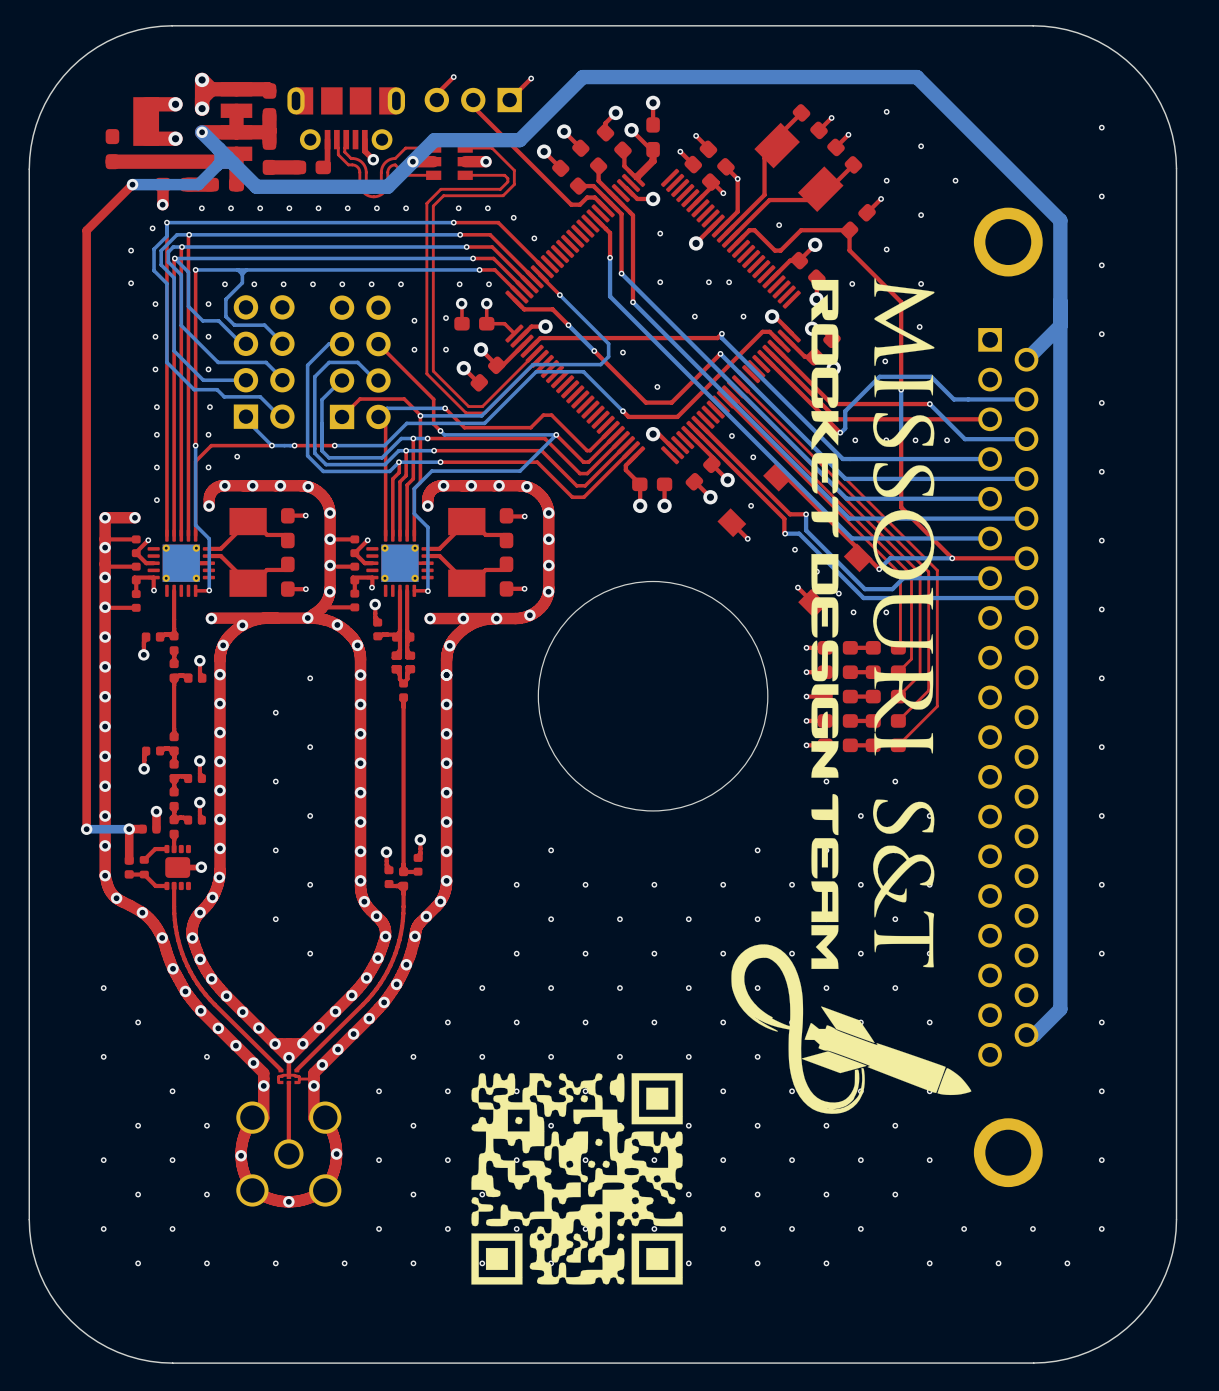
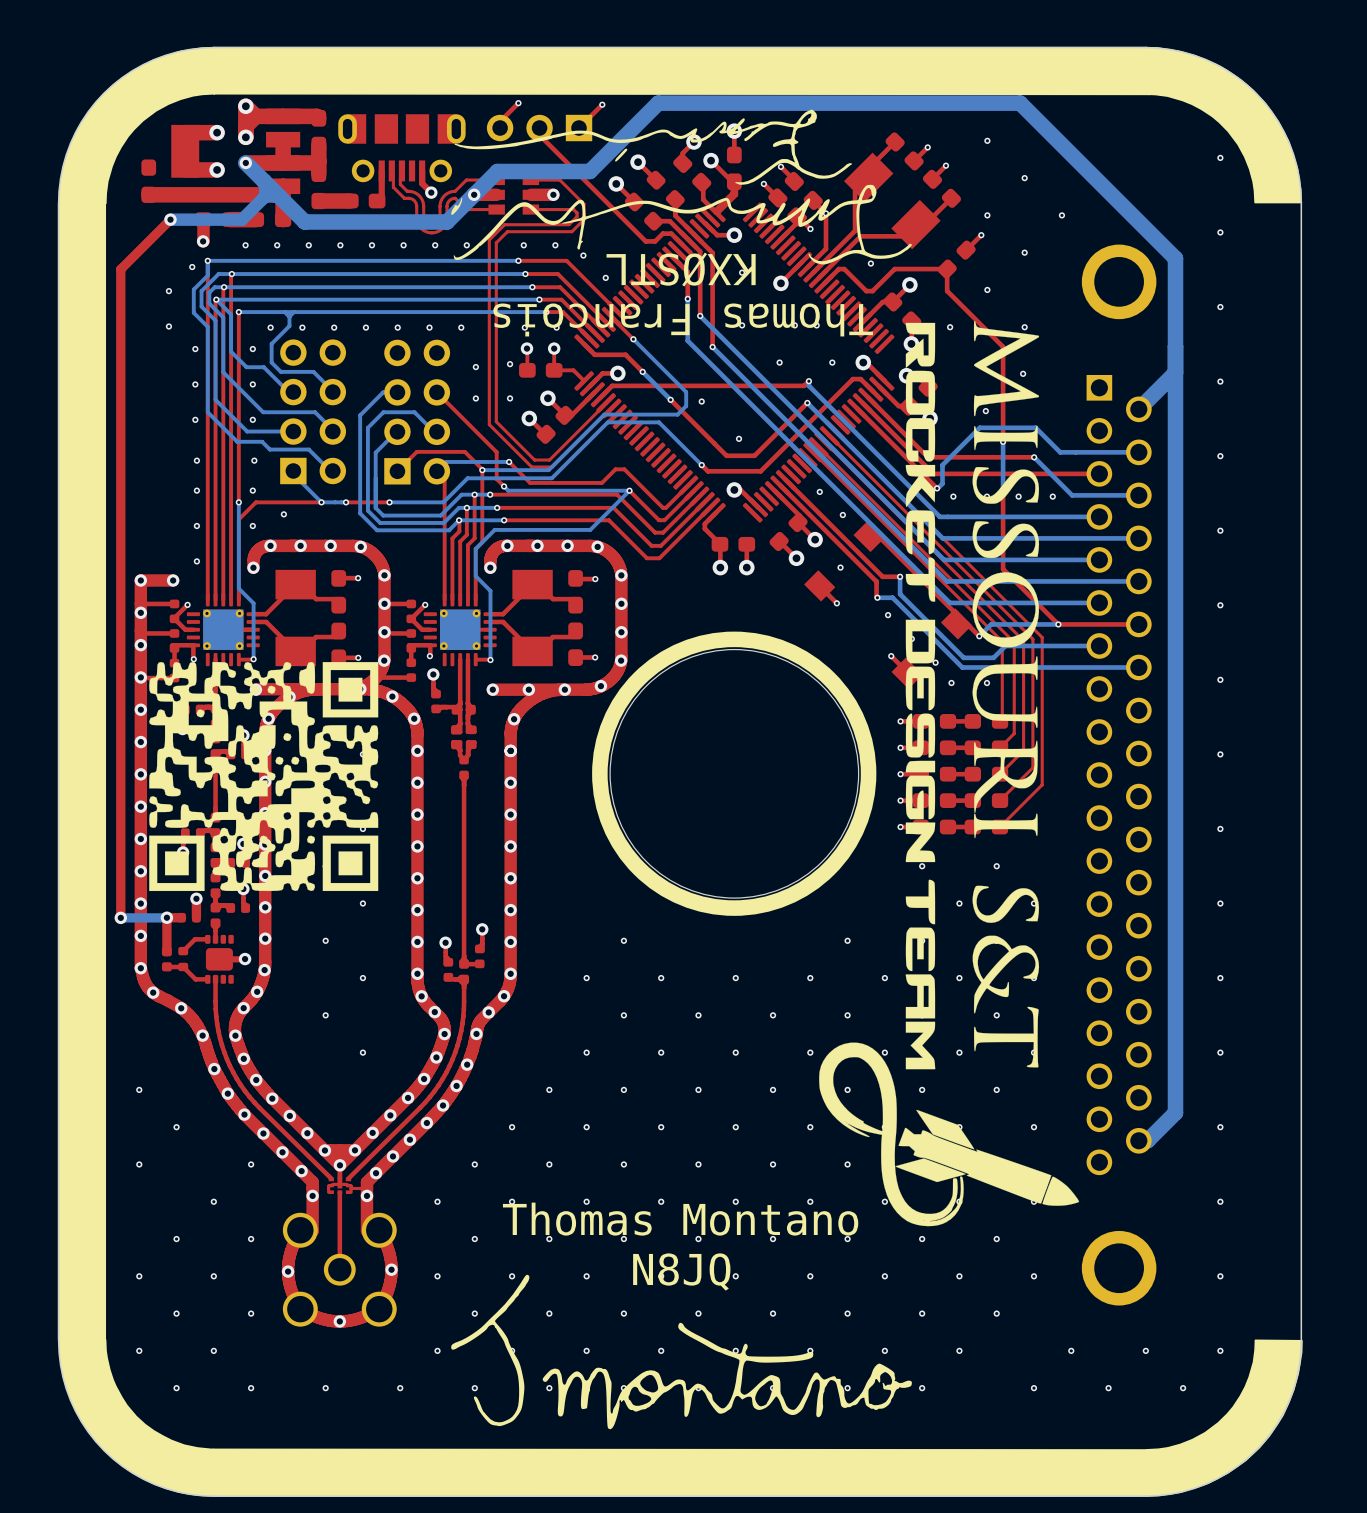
drawing: none -> [57, 46, 1303, 1497]
text: none -> KXØSTL (681, 269)
text: none -> Thomas Francois (683, 319)
drawing: none -> [592, 631, 877, 916]
drawing: none -> [149, 662, 379, 892]
drawing: [471, 1073, 683, 1285] -> none
text: none -> Thomas Montano (680, 1219)
text: none -> N8JQ (681, 1272)
drawing: none -> [451, 1274, 912, 1430]

